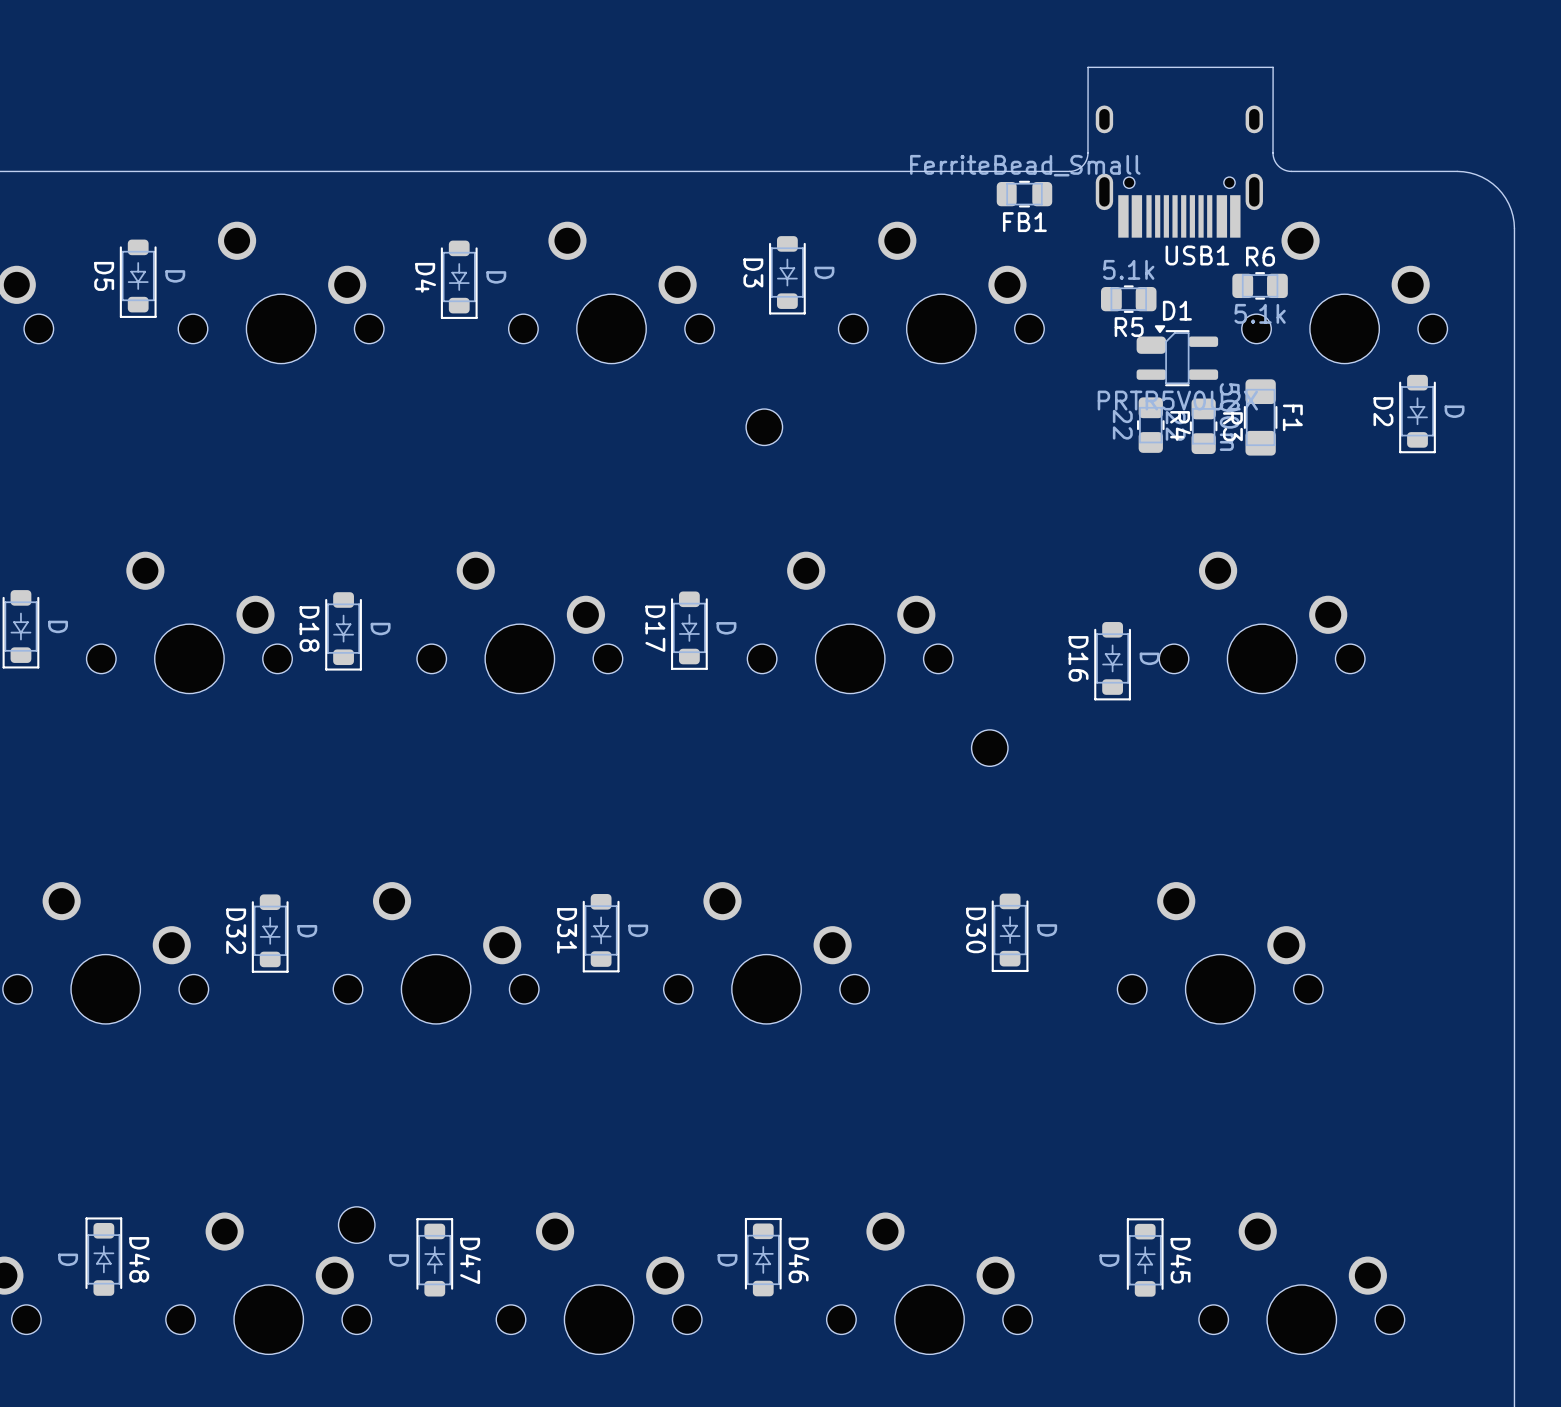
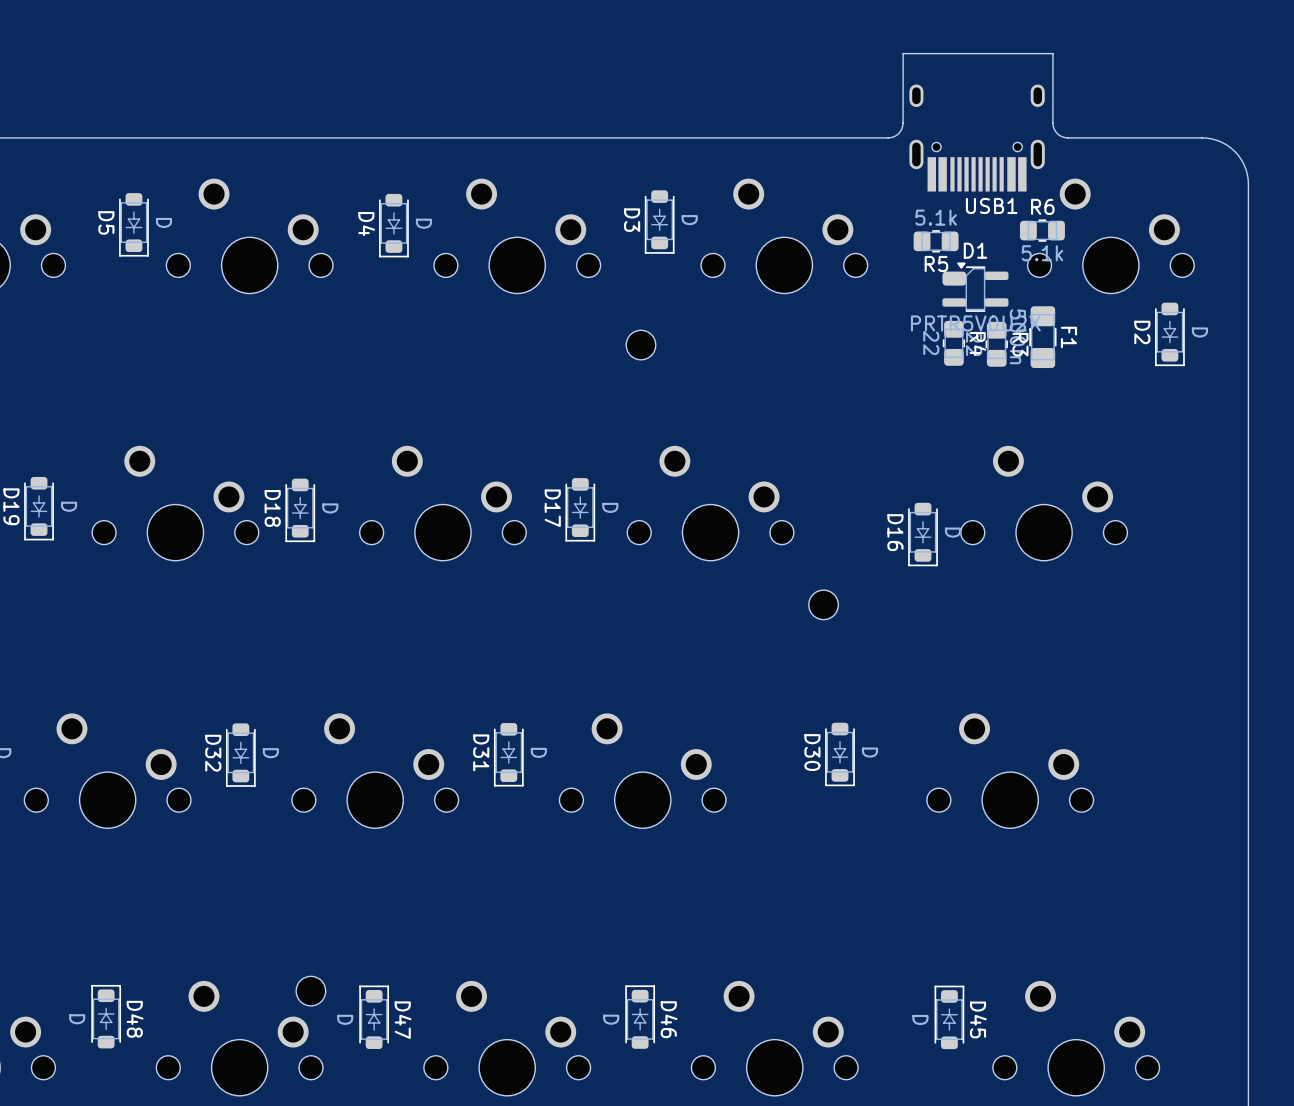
FB1: FerriteBead_Small (1024, 194) -> none

